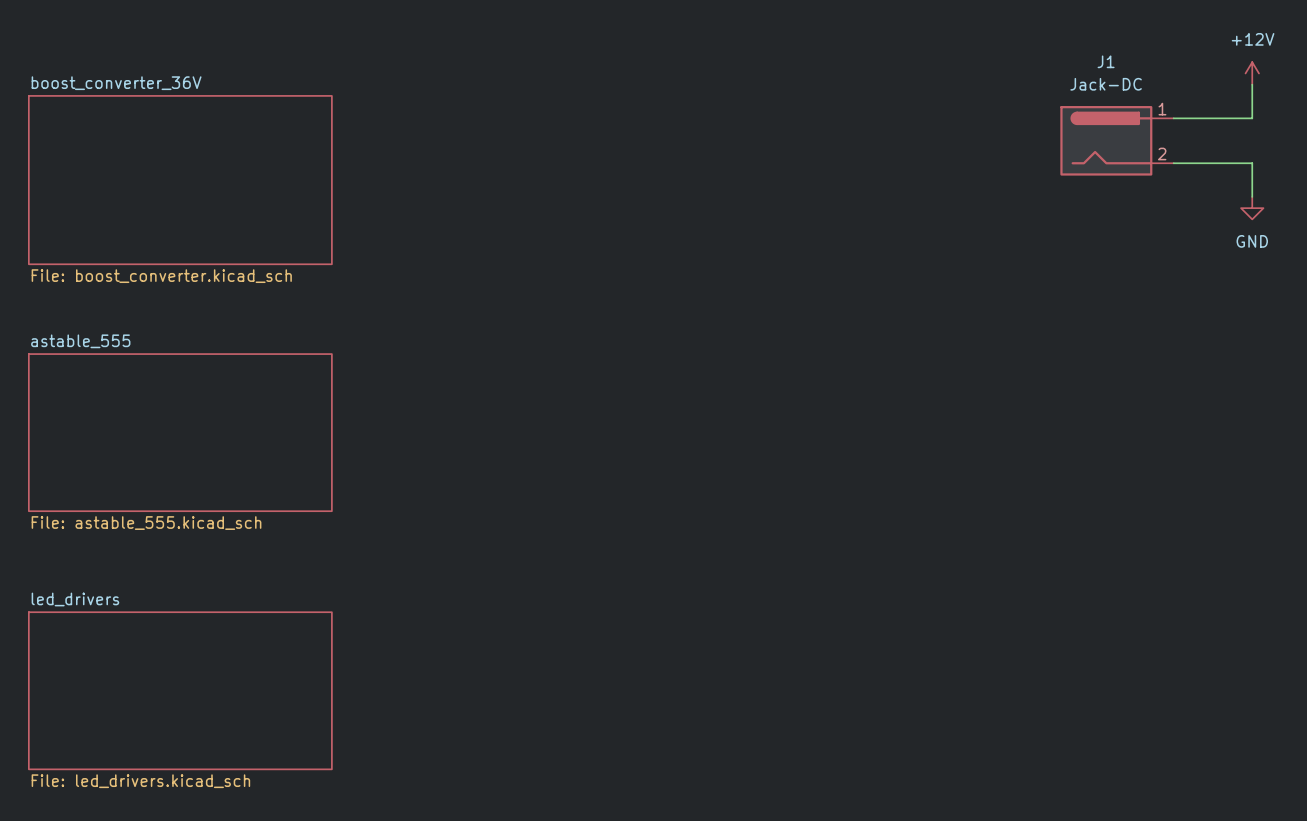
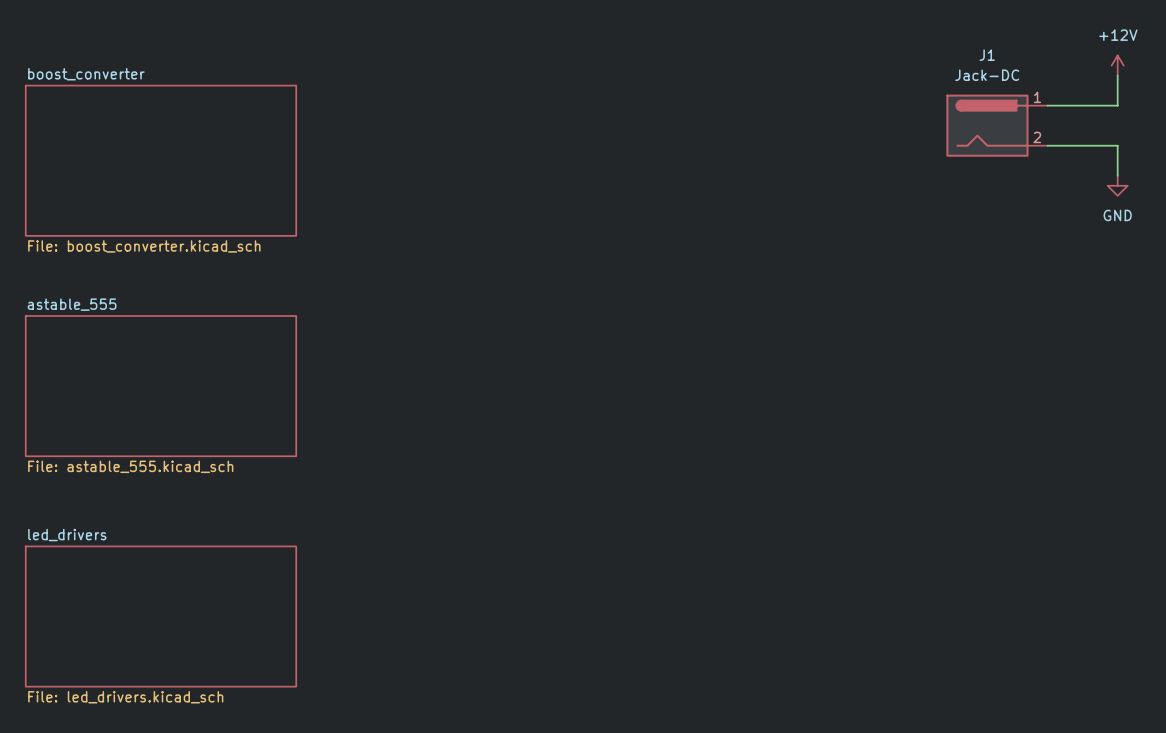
sheet boost_converter_36V name: boost_converter_36V (116, 83) -> boost_converter (86, 74)

